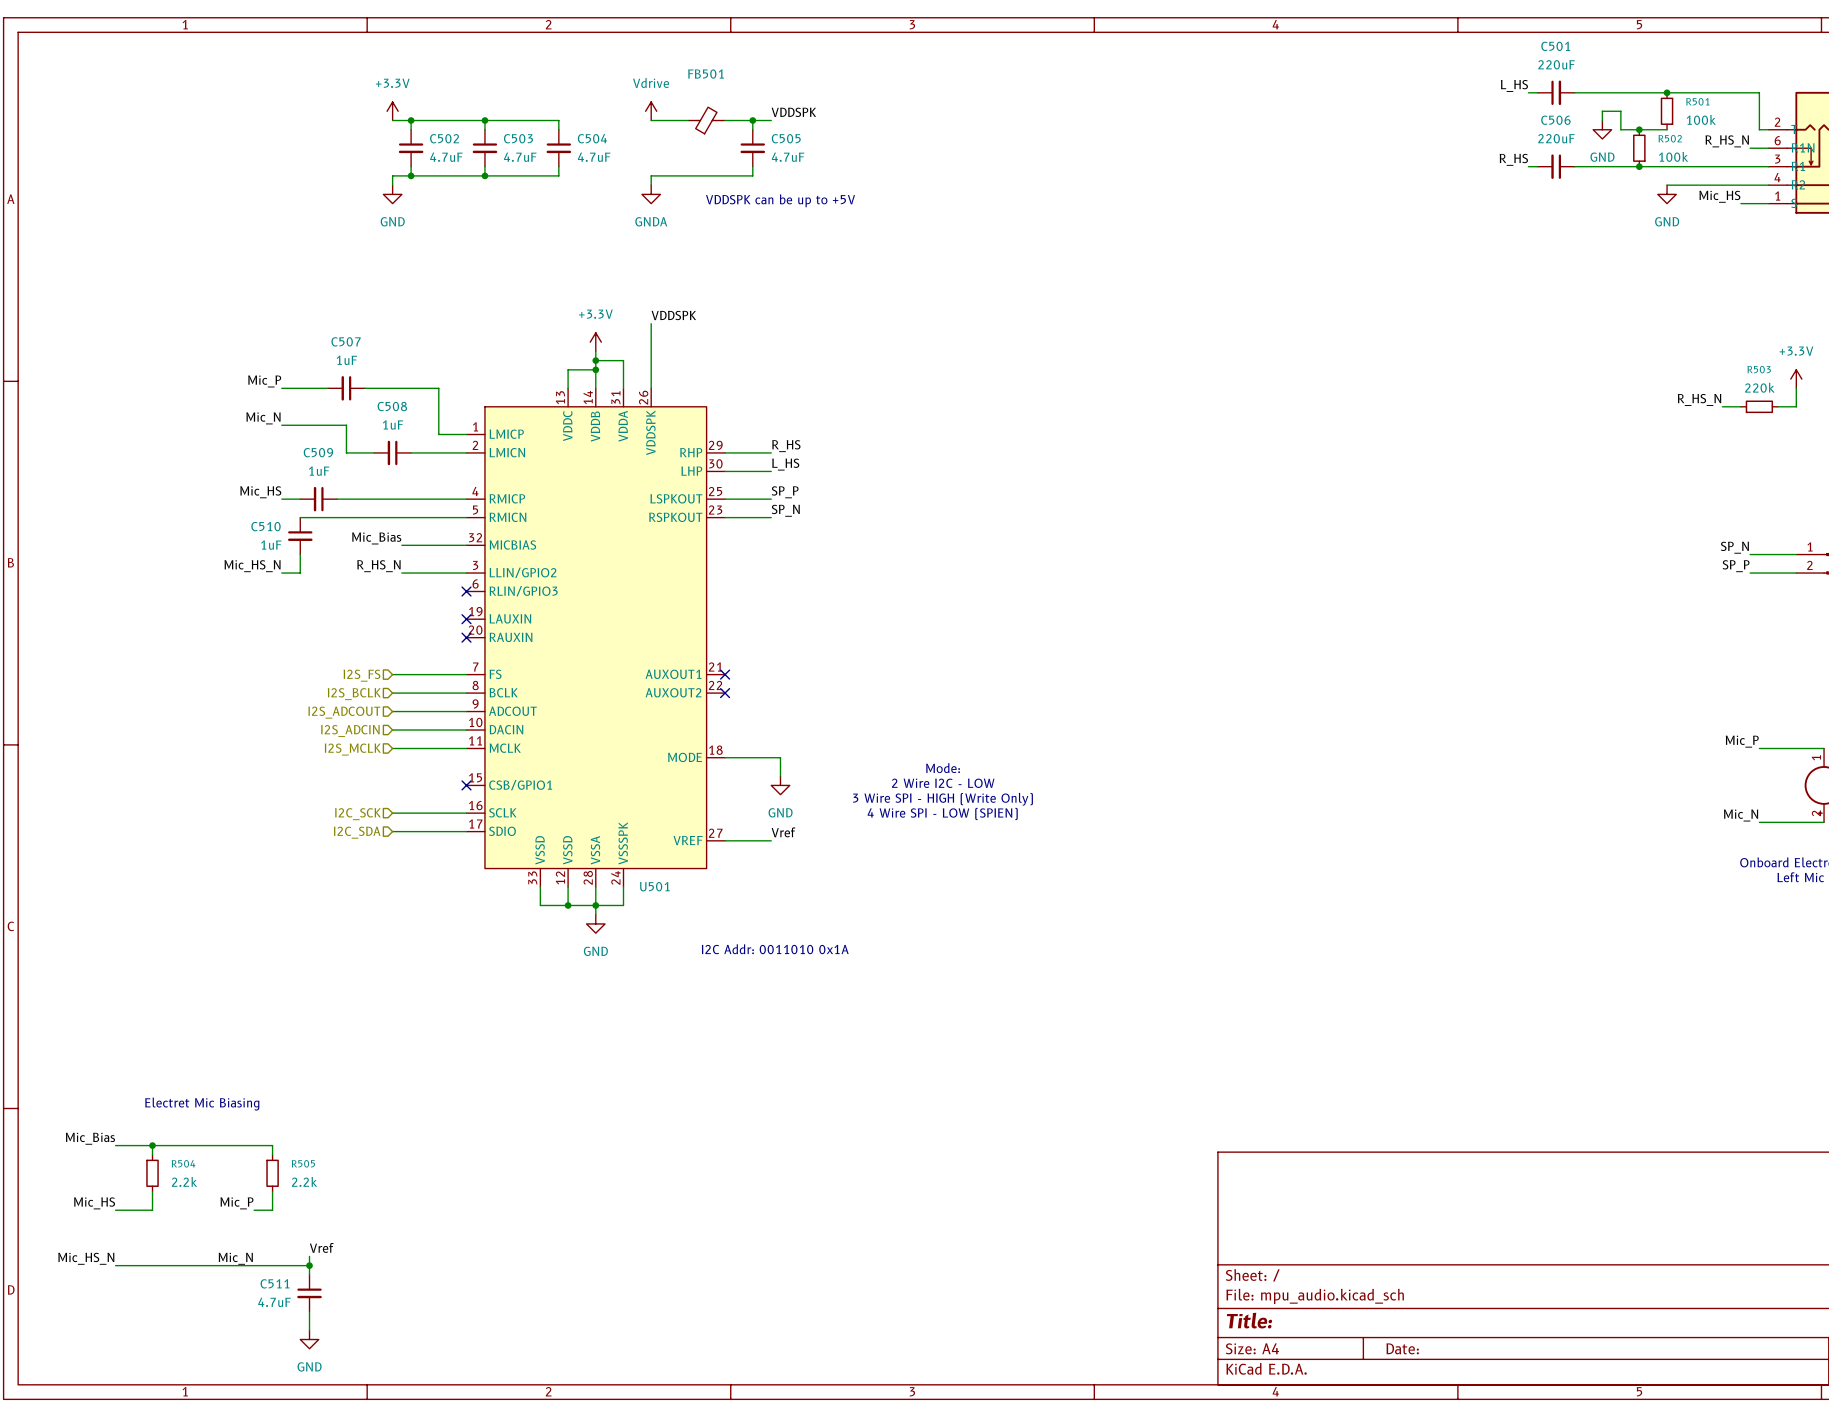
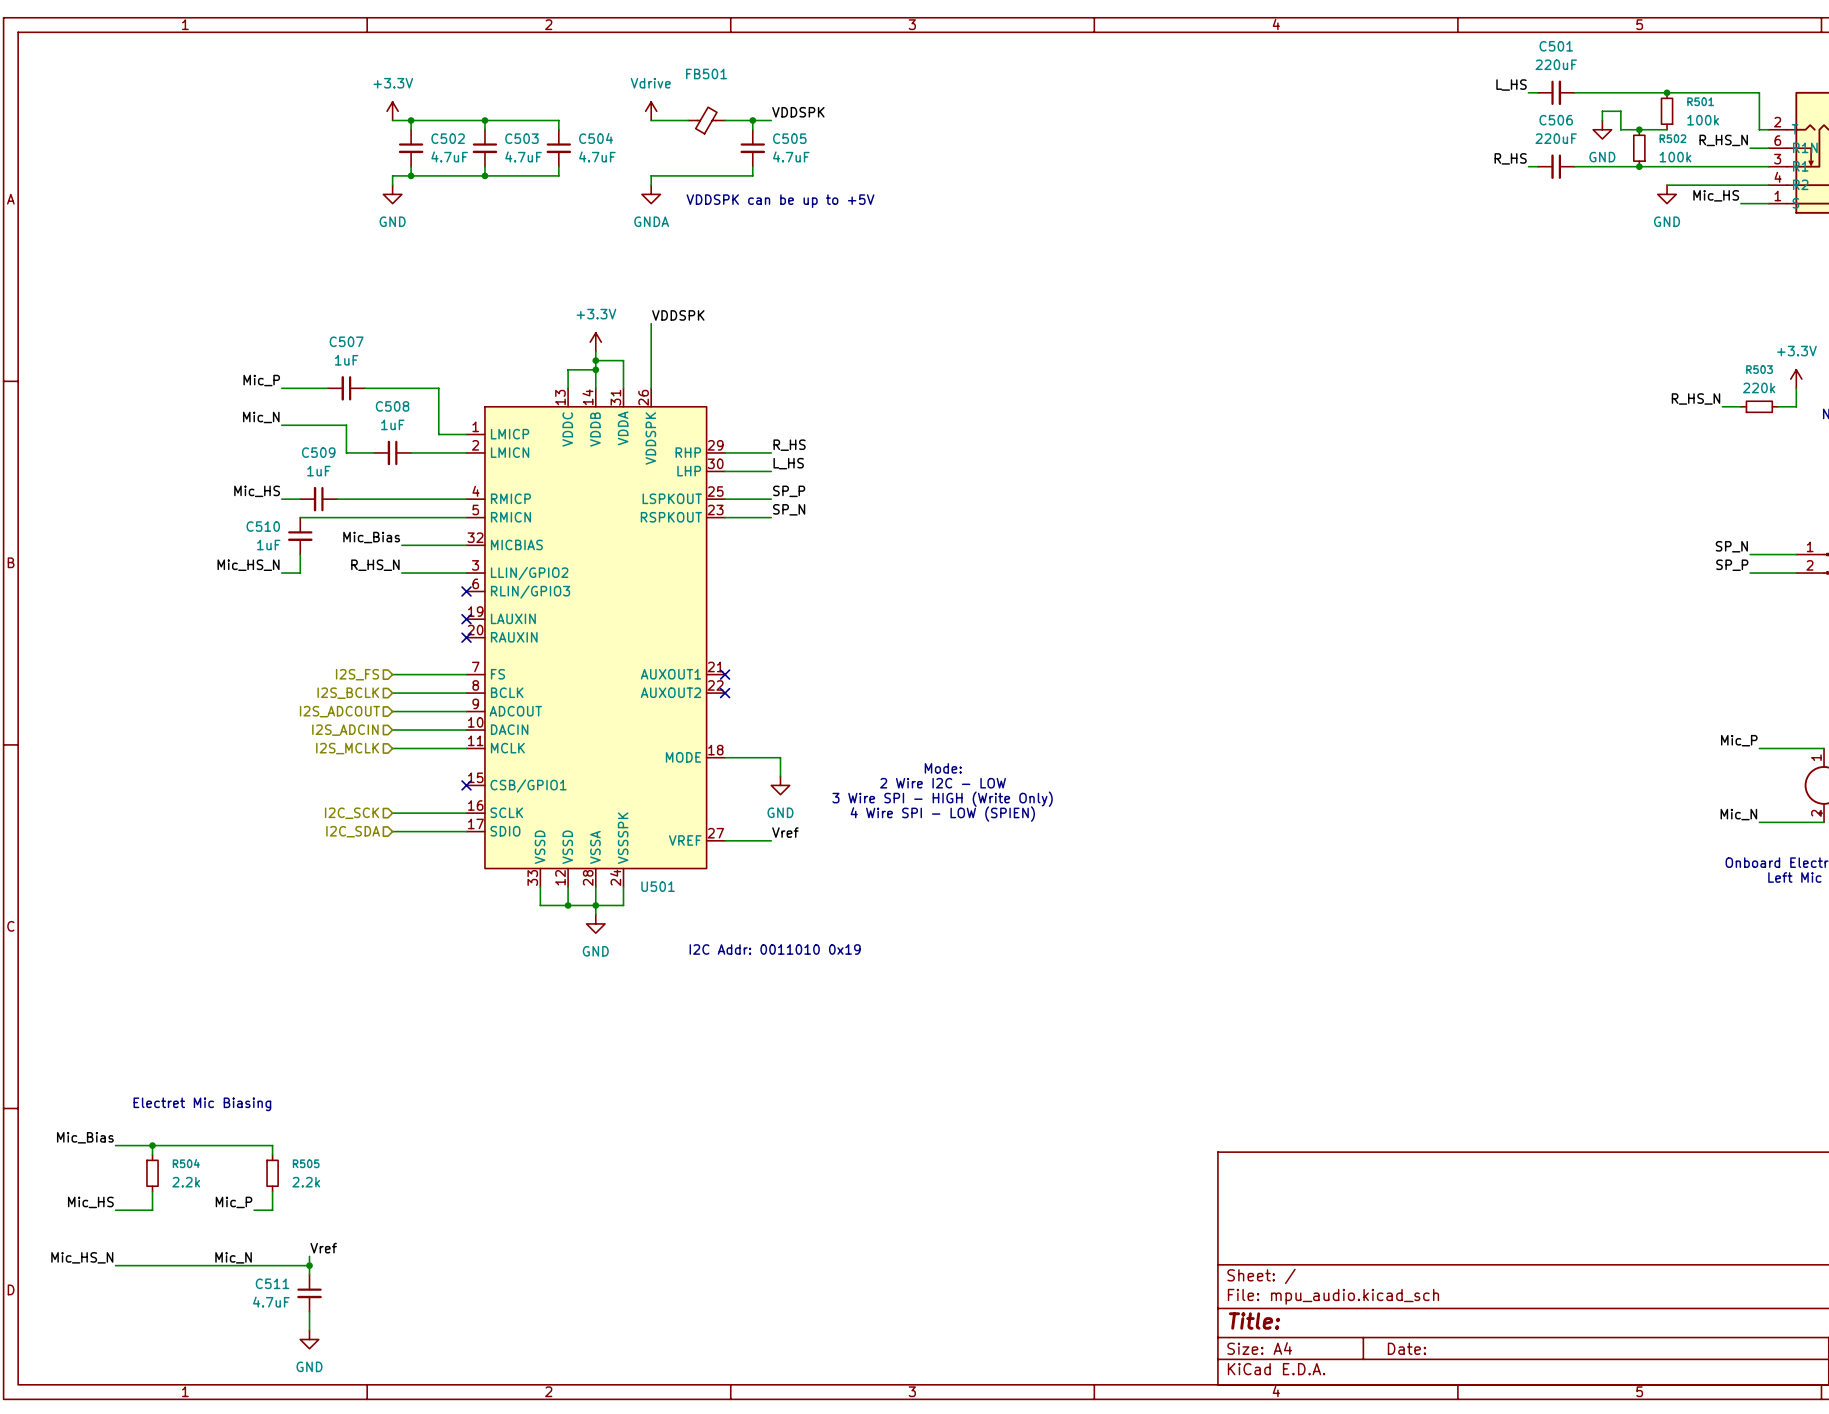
text: I2C Addr: 0011010 0x1A (775, 949) -> I2C Addr: 0011010 0x19 (775, 949)

